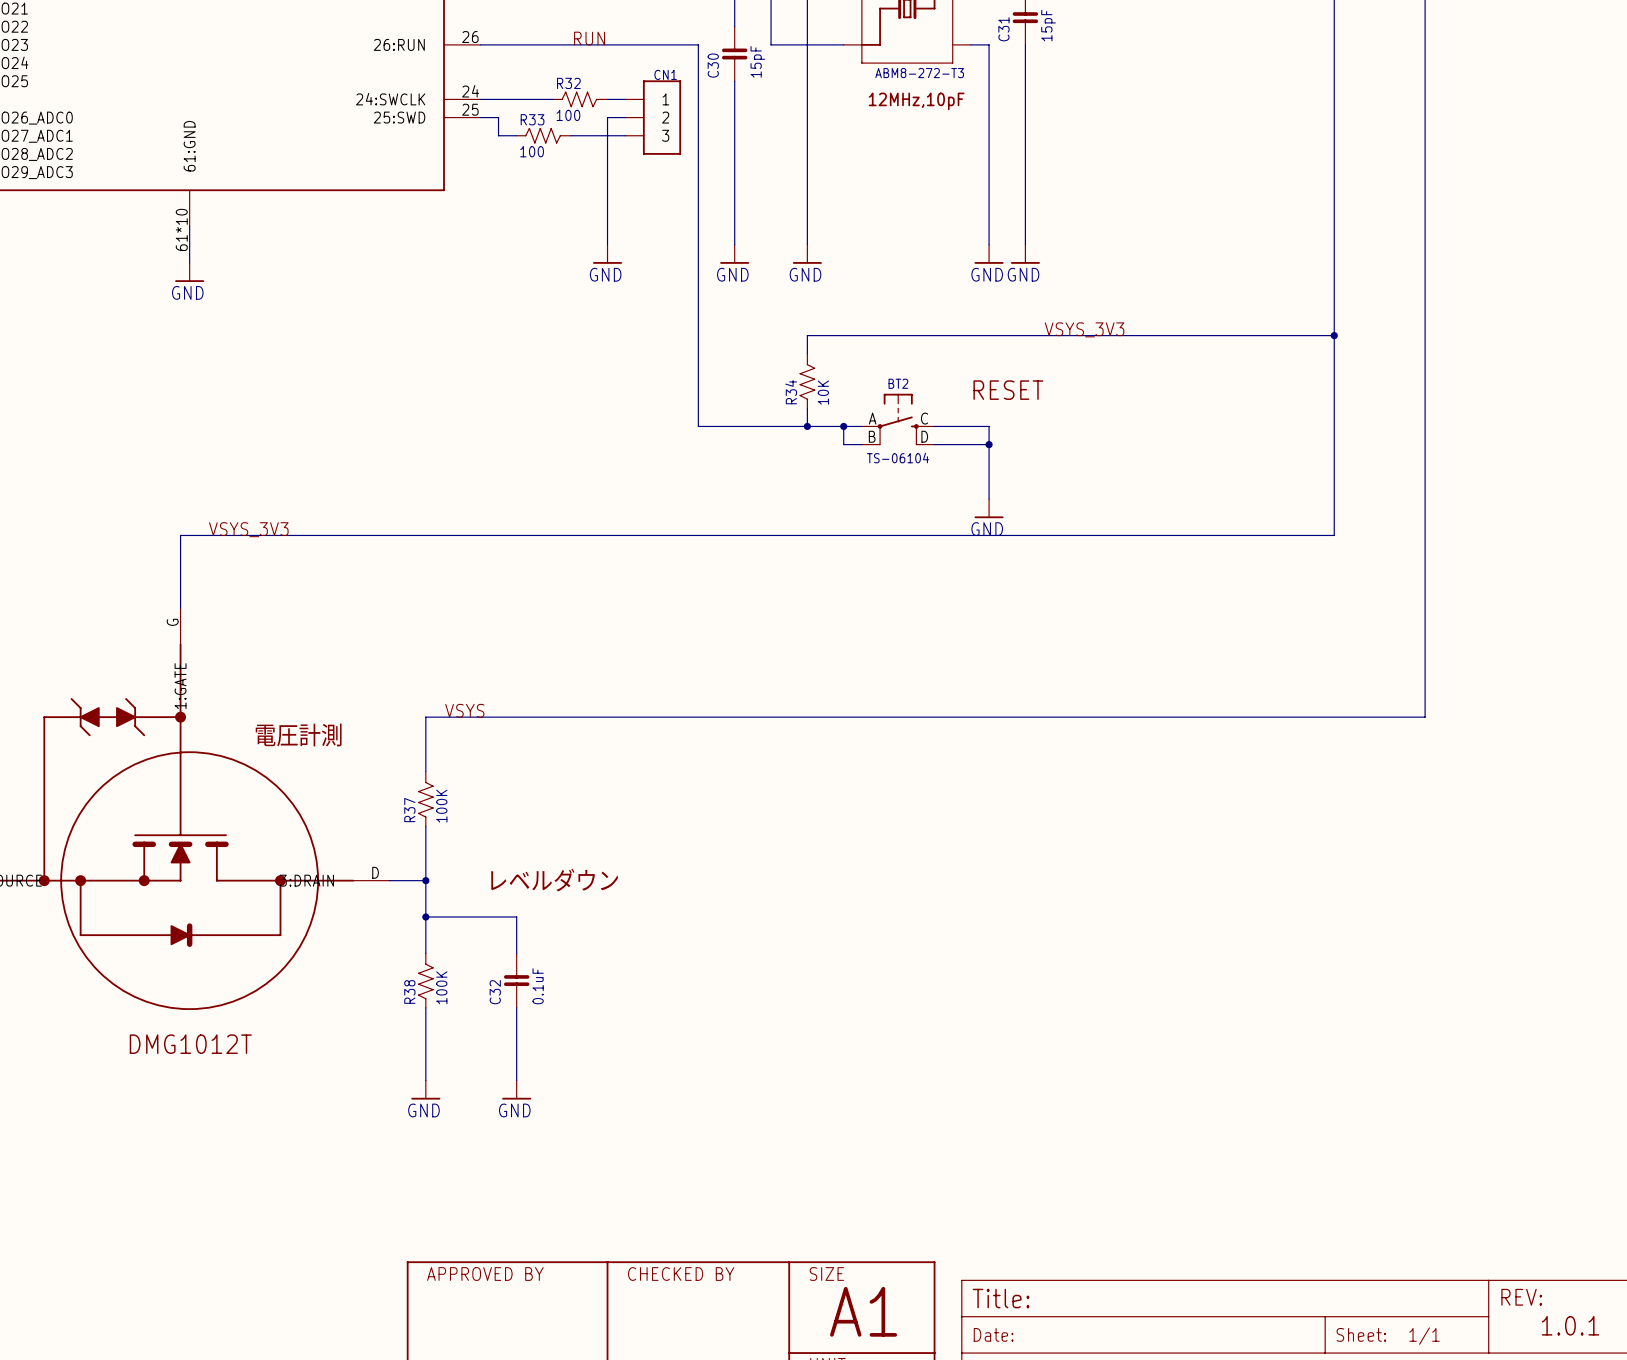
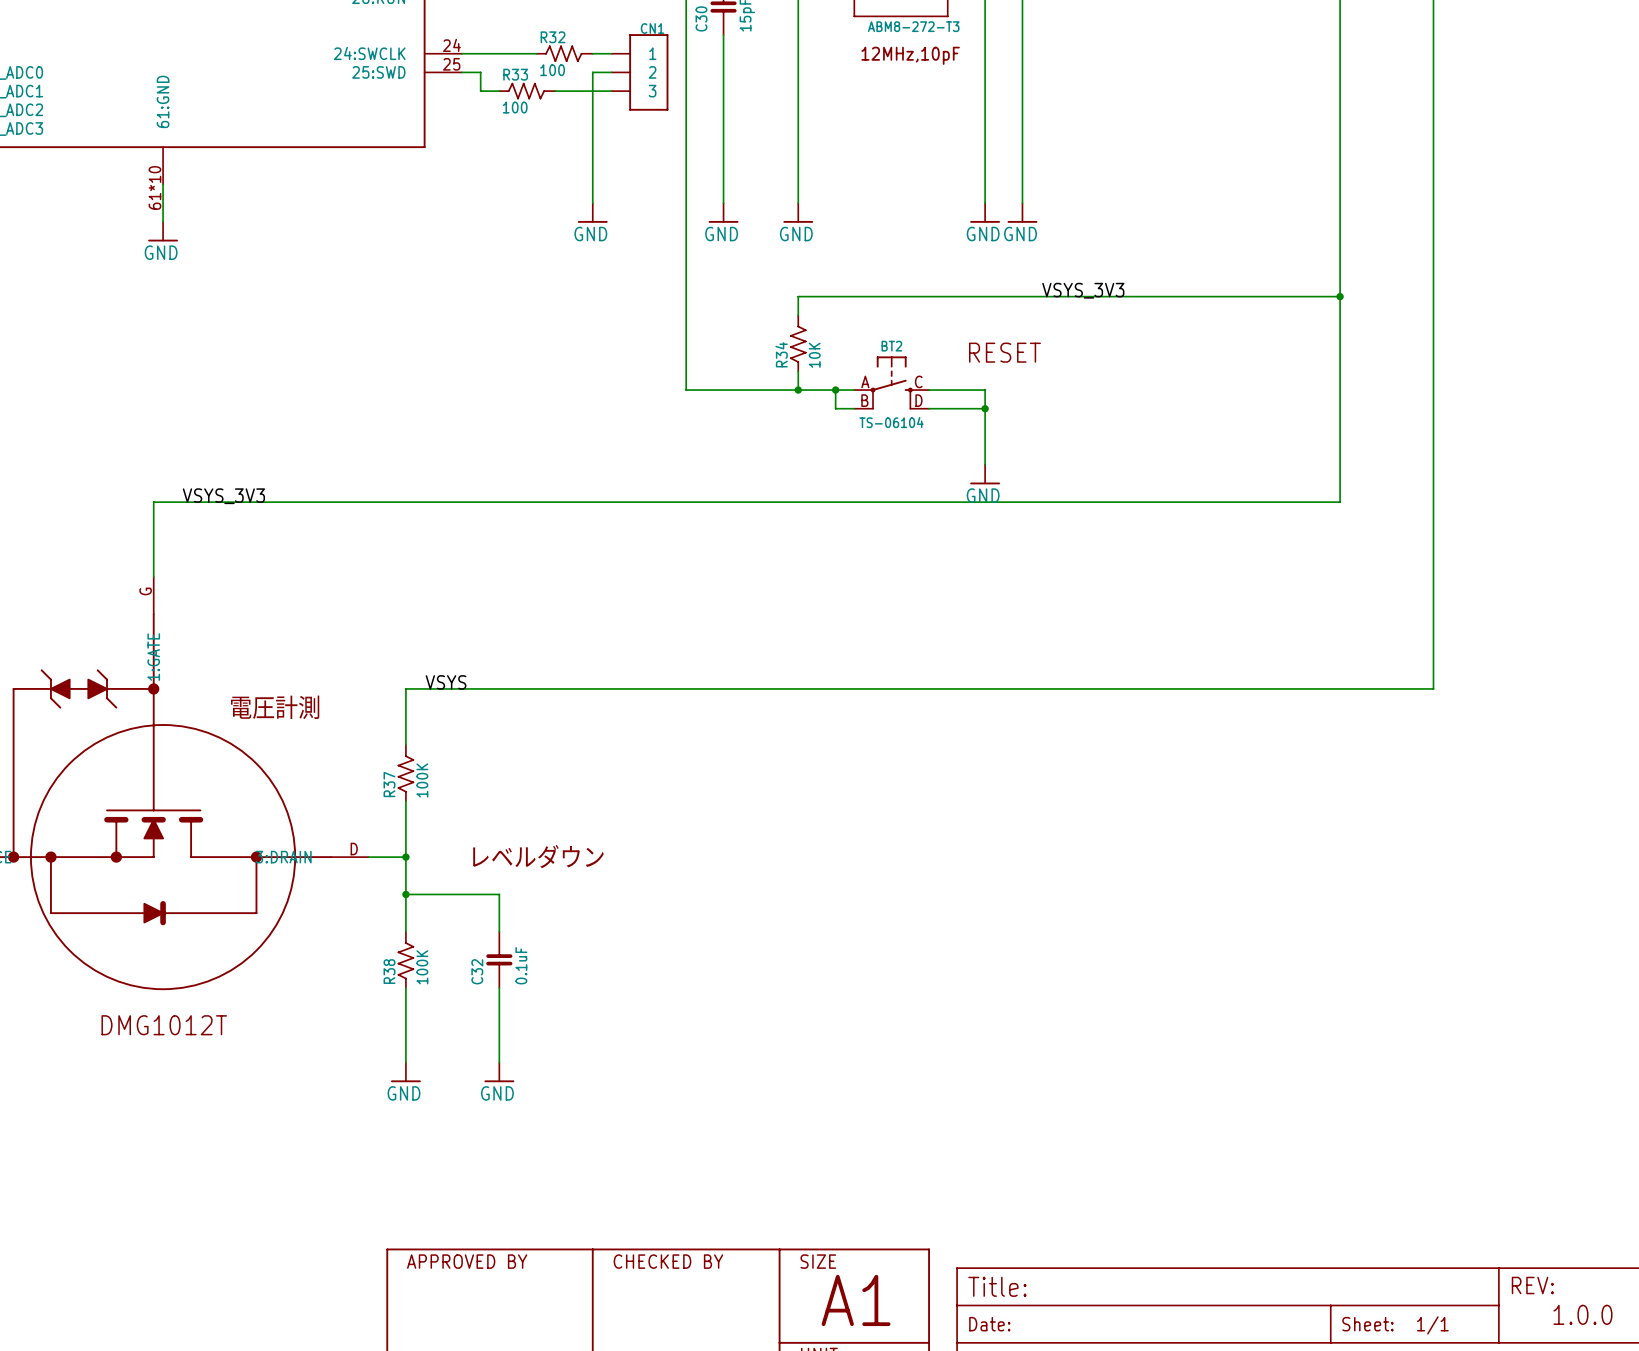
text: 1.0.1 (1570, 1325) -> 1.0.0 (1582, 1314)

